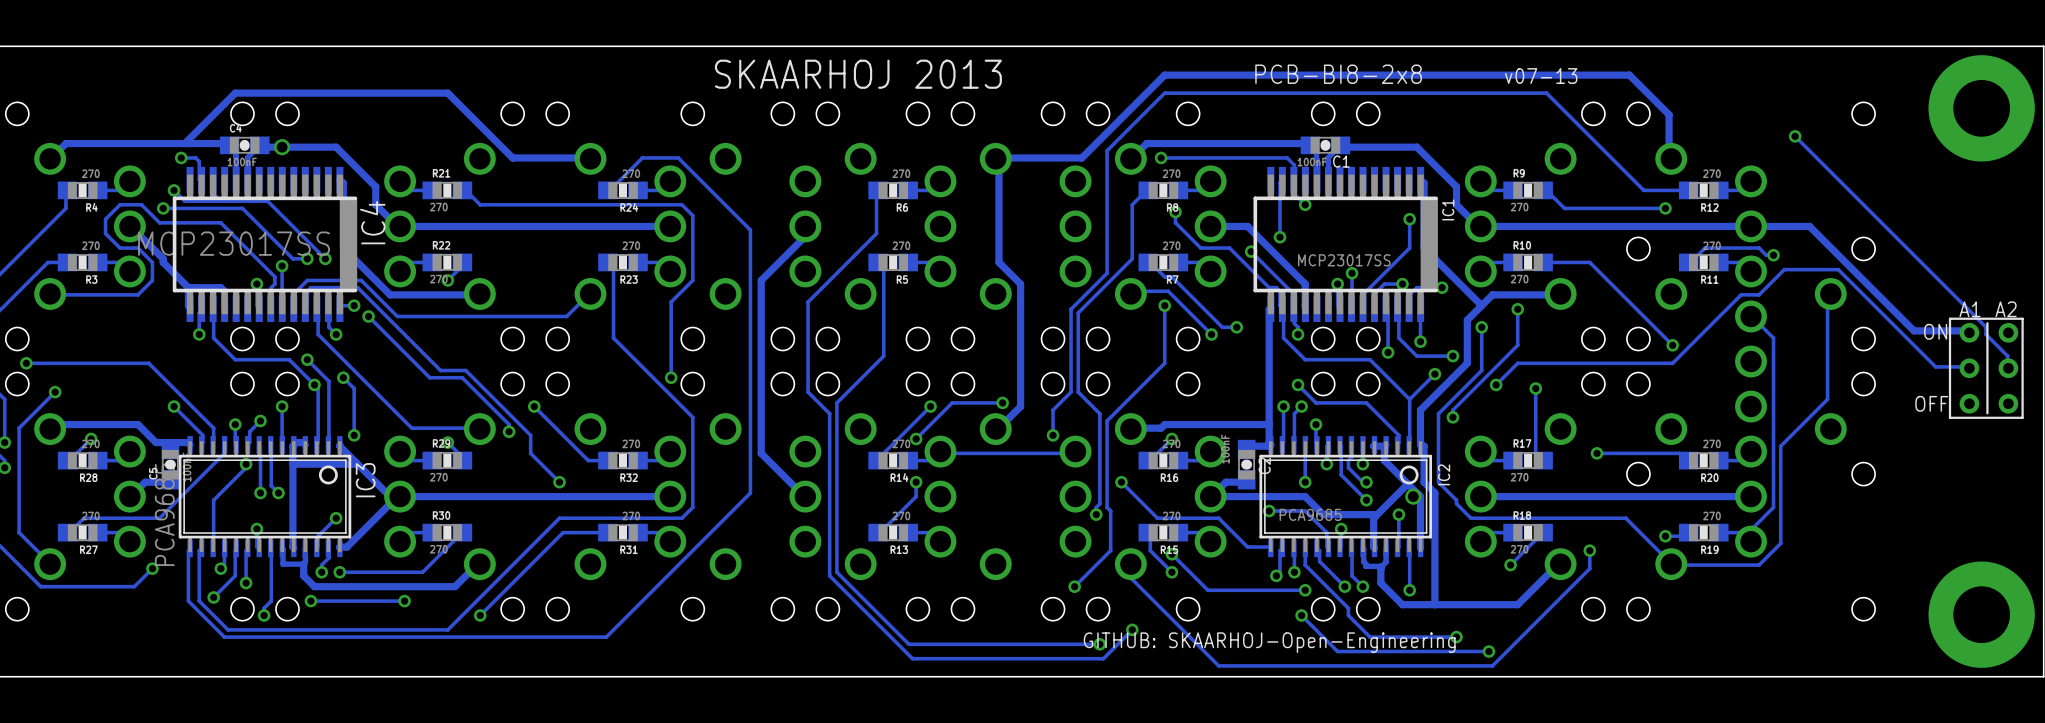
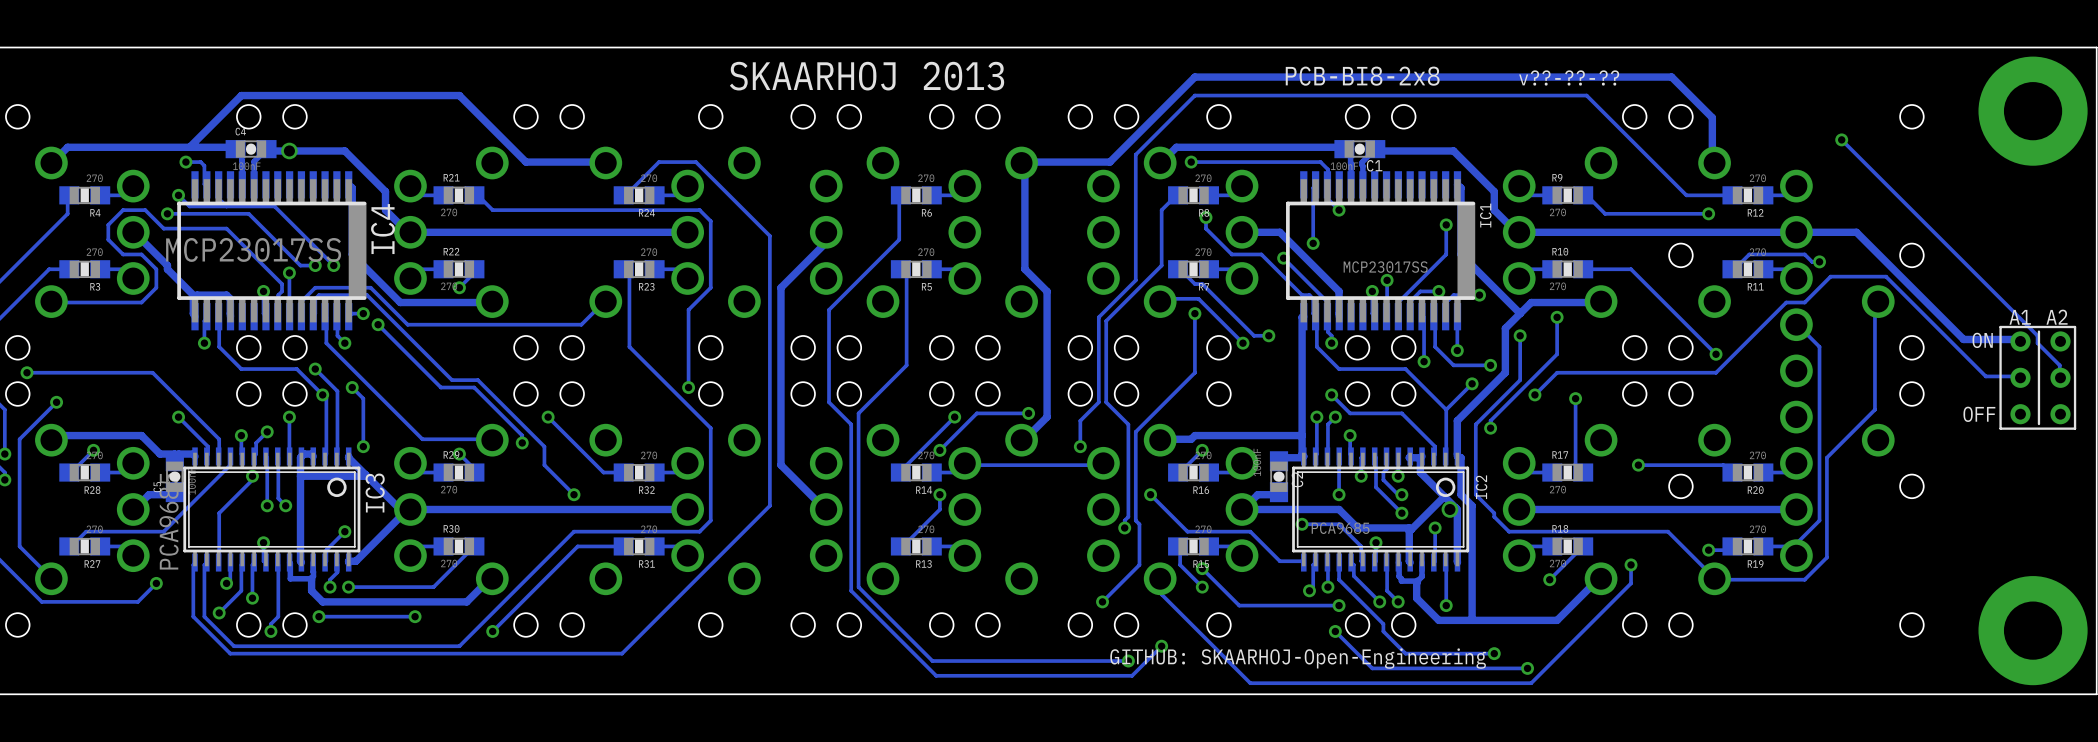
text: v07-13 (1541, 76) -> v??-??-?? (1569, 77)

